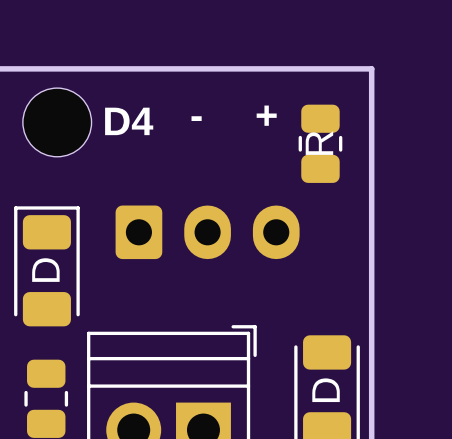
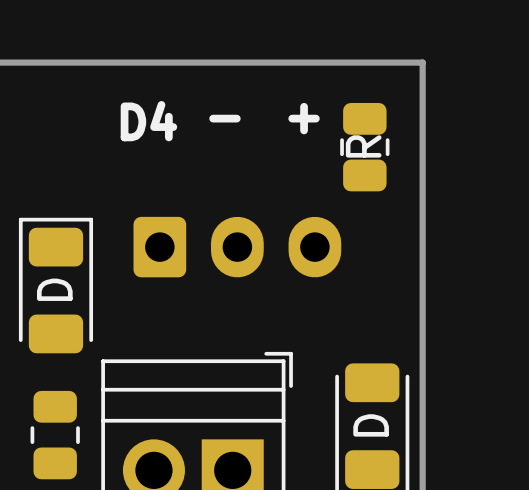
part: (57, 122) -> none

